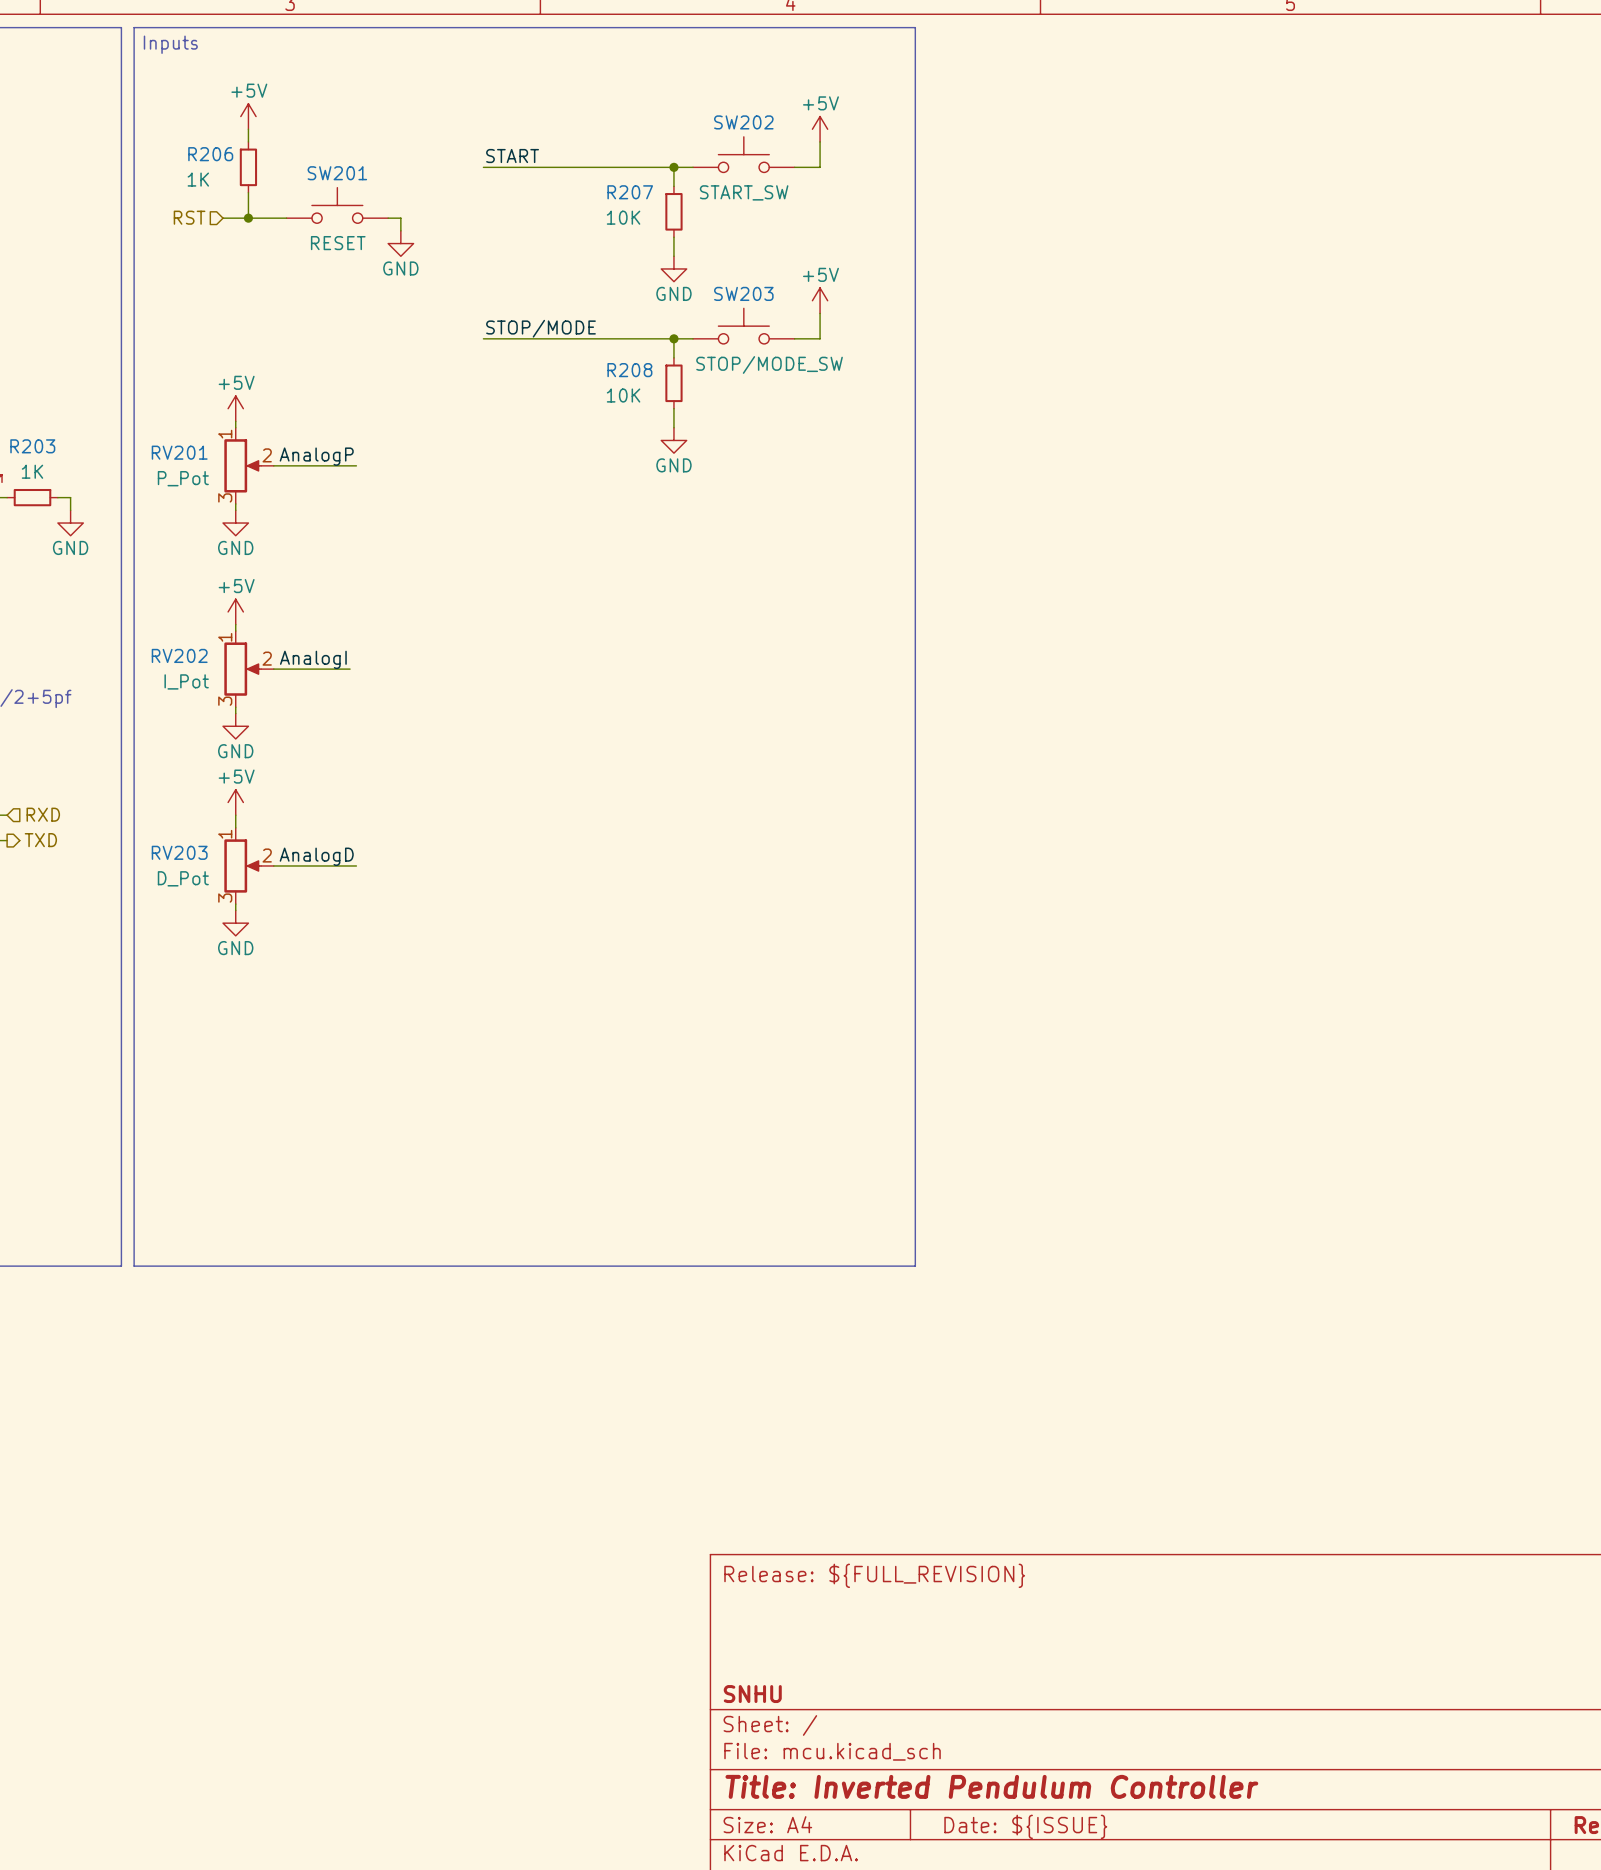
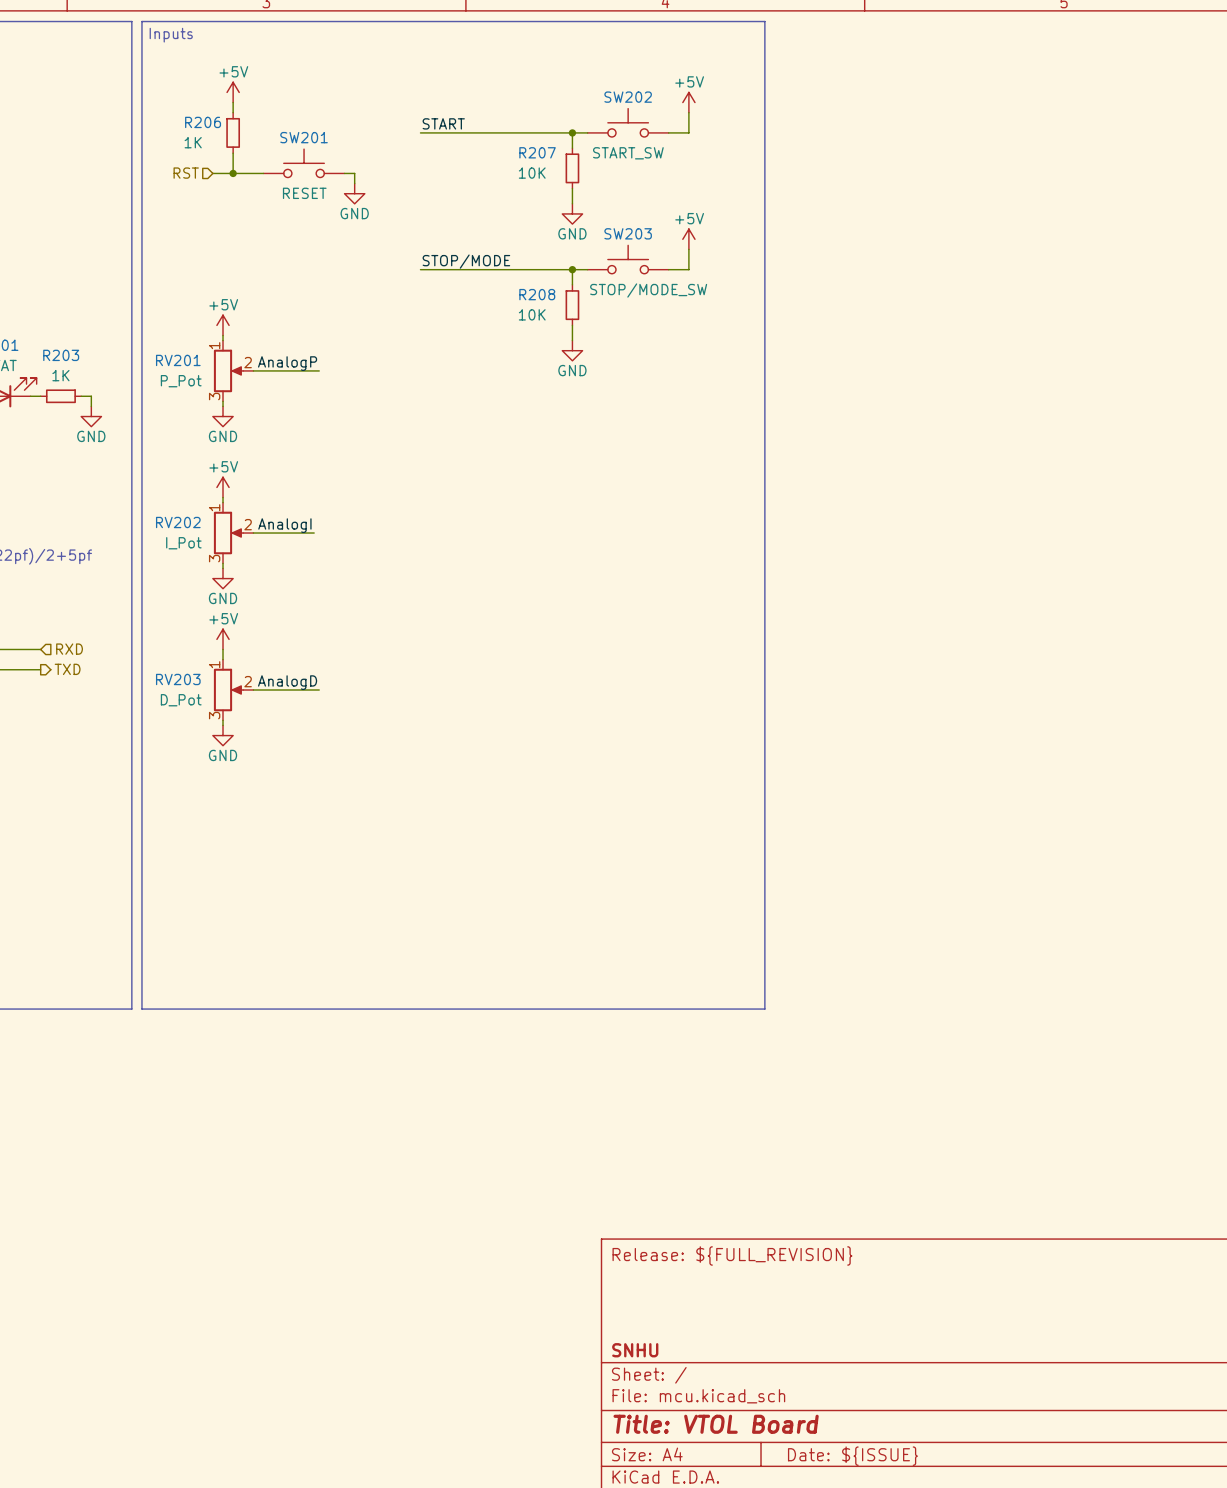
title block: Title: Inverted Pendulum Controller (991, 1786) -> Title: VTOL Board (716, 1424)

